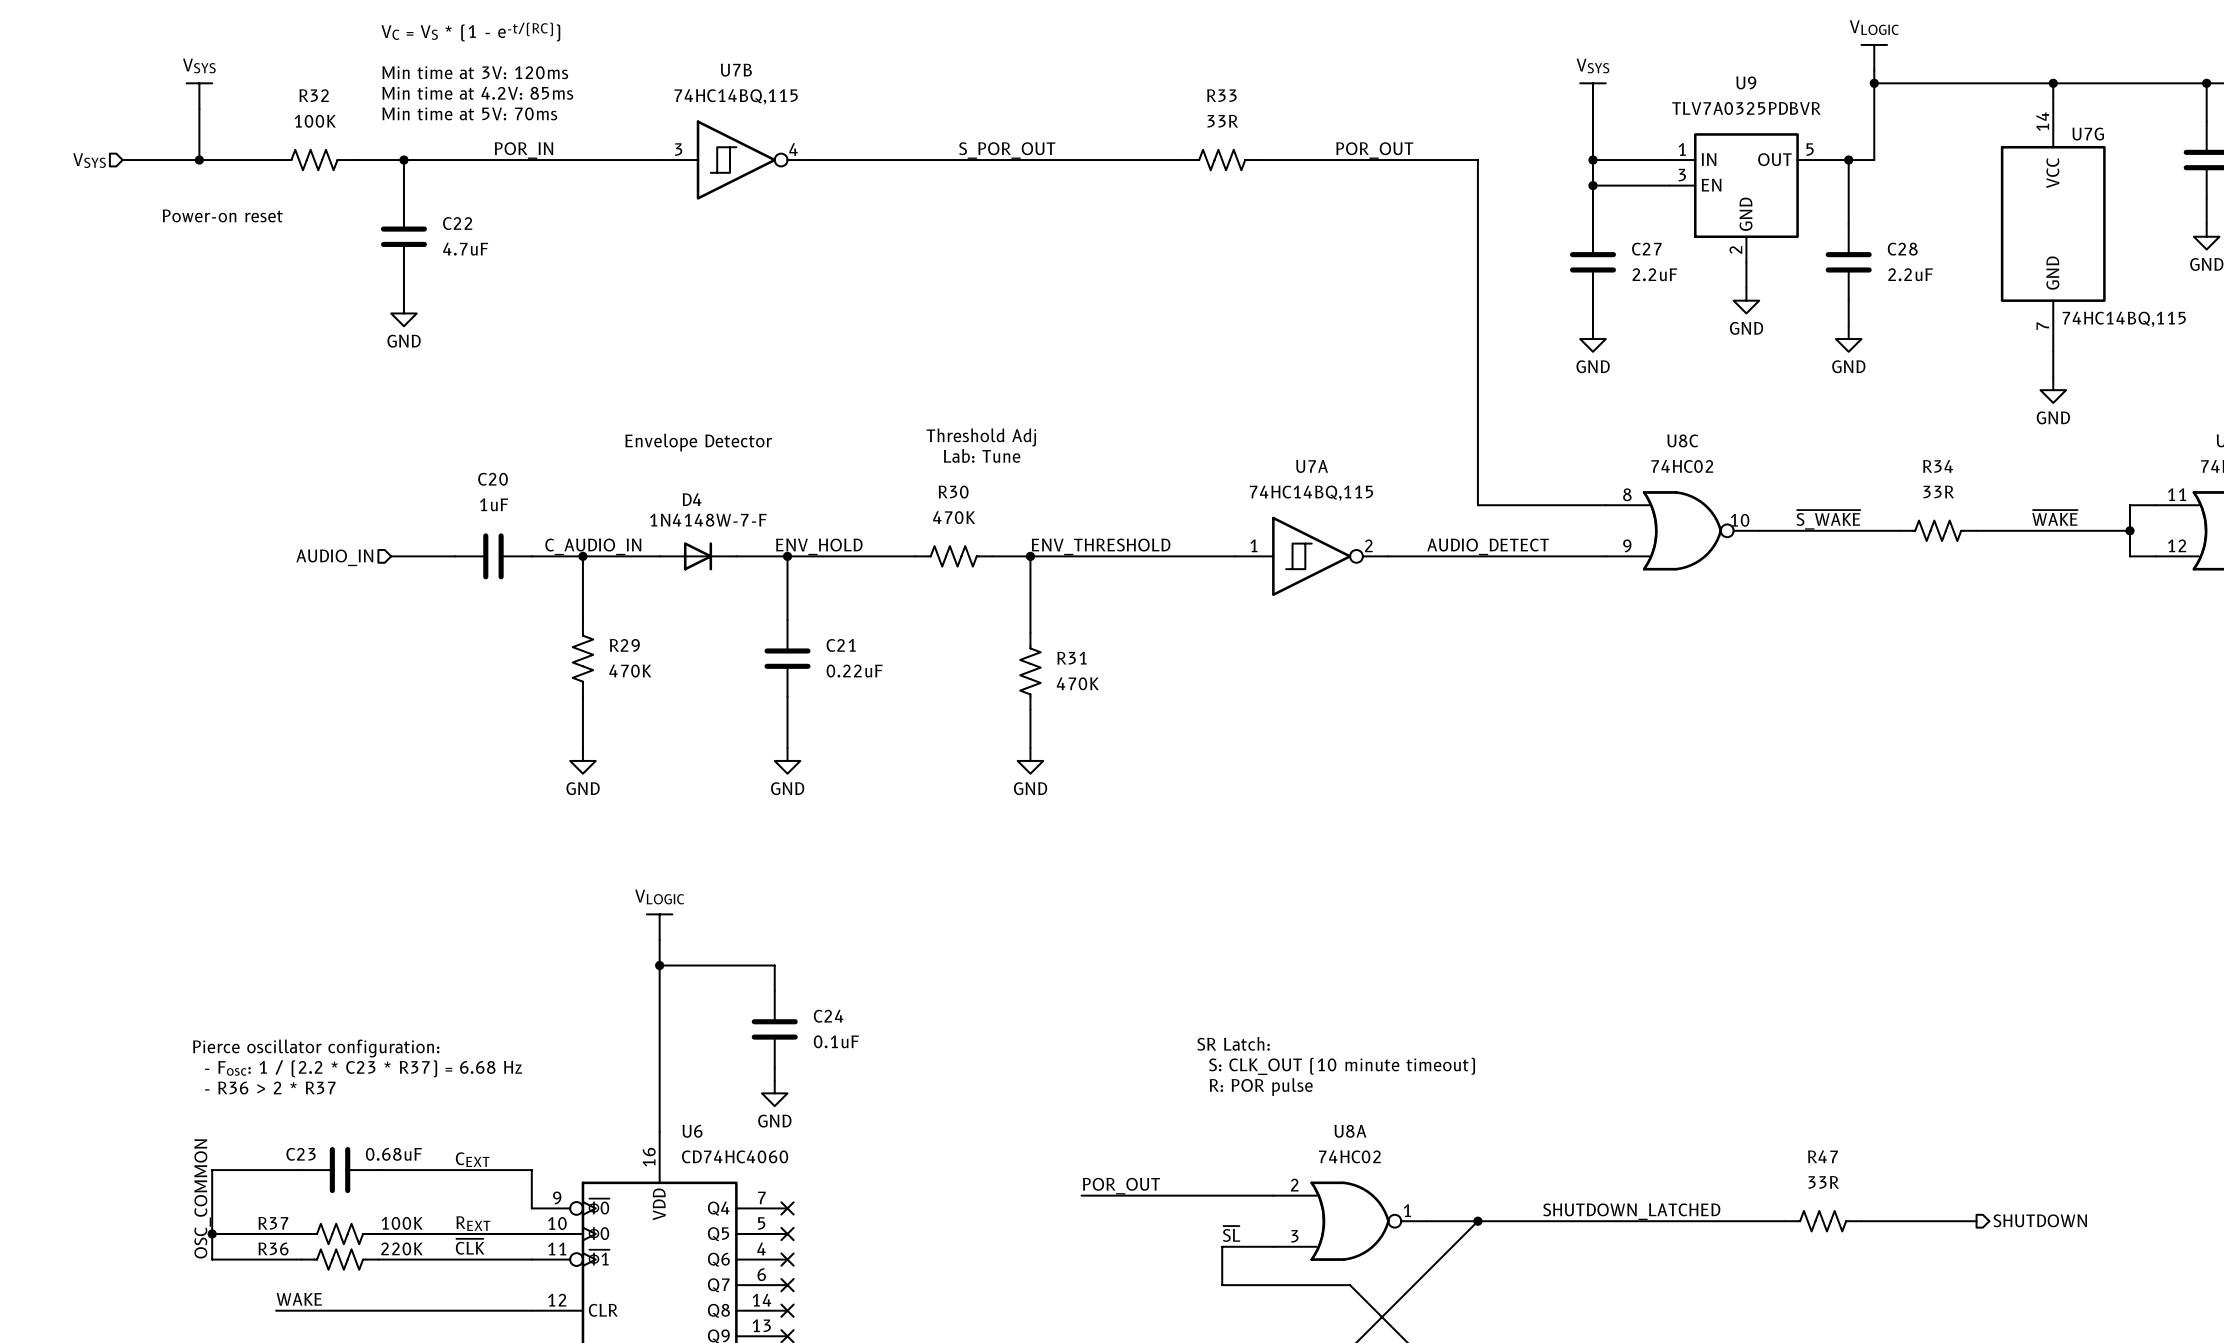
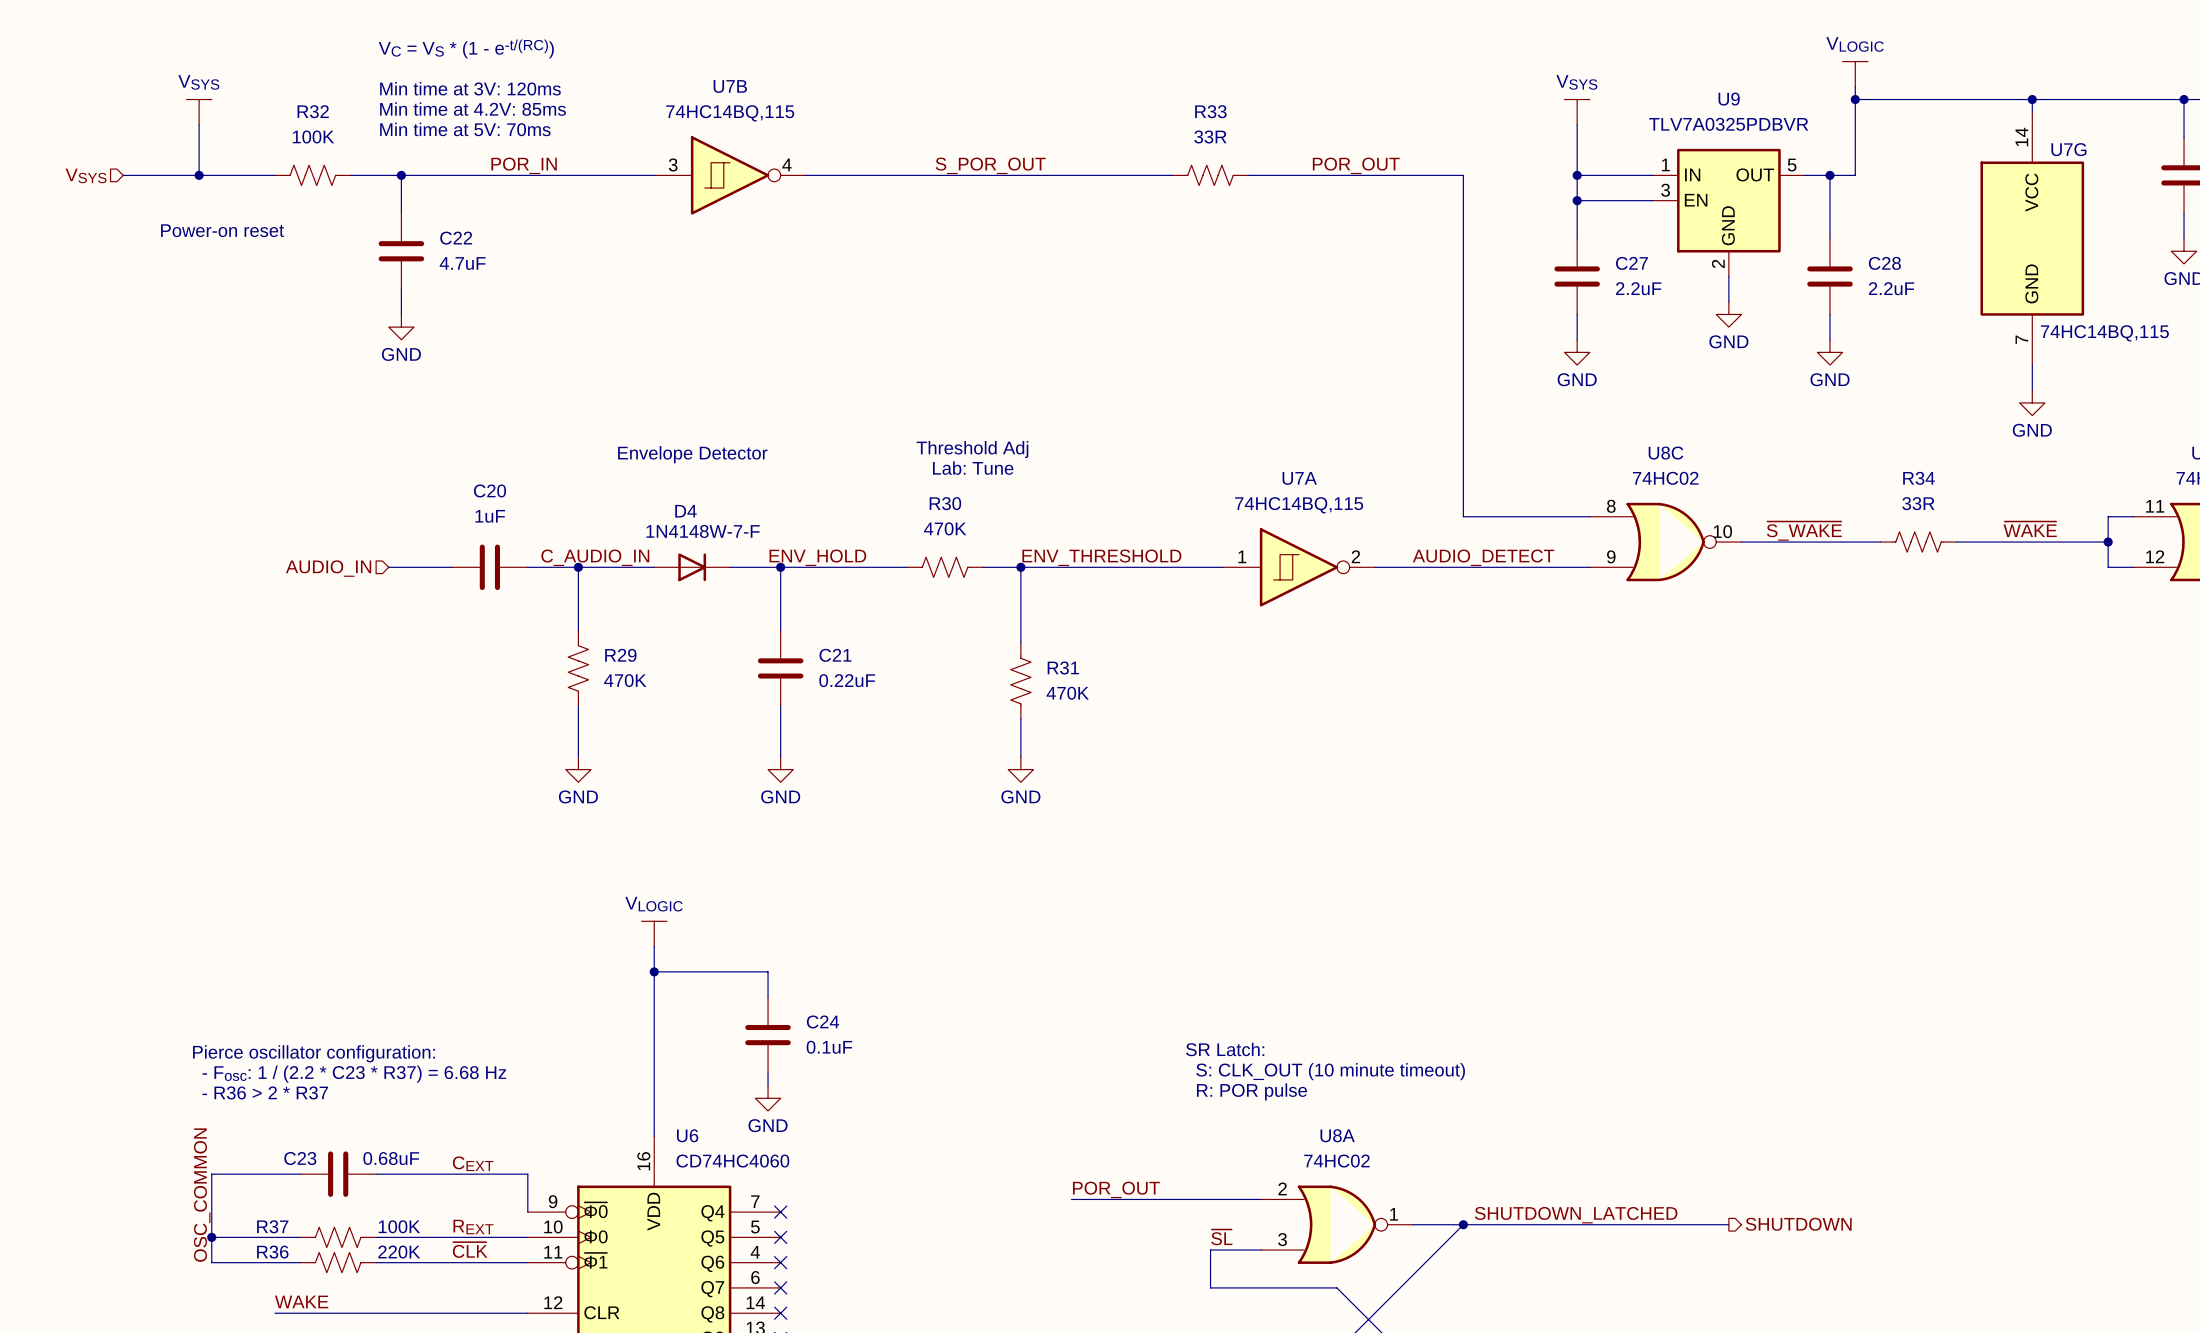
label position: SHUTDOWN_LATCHED (1631, 1211) -> SHUTDOWN_LATCHED (1576, 1215)
hierarchical label position: SHUTDOWN (2040, 1220) -> SHUTDOWN (1798, 1224)
wire: (1746, 1221) (1784, 1221) -> none
R47: 33R (1823, 1221) -> none
wire: (1861, 1221) (1976, 1221) -> none

